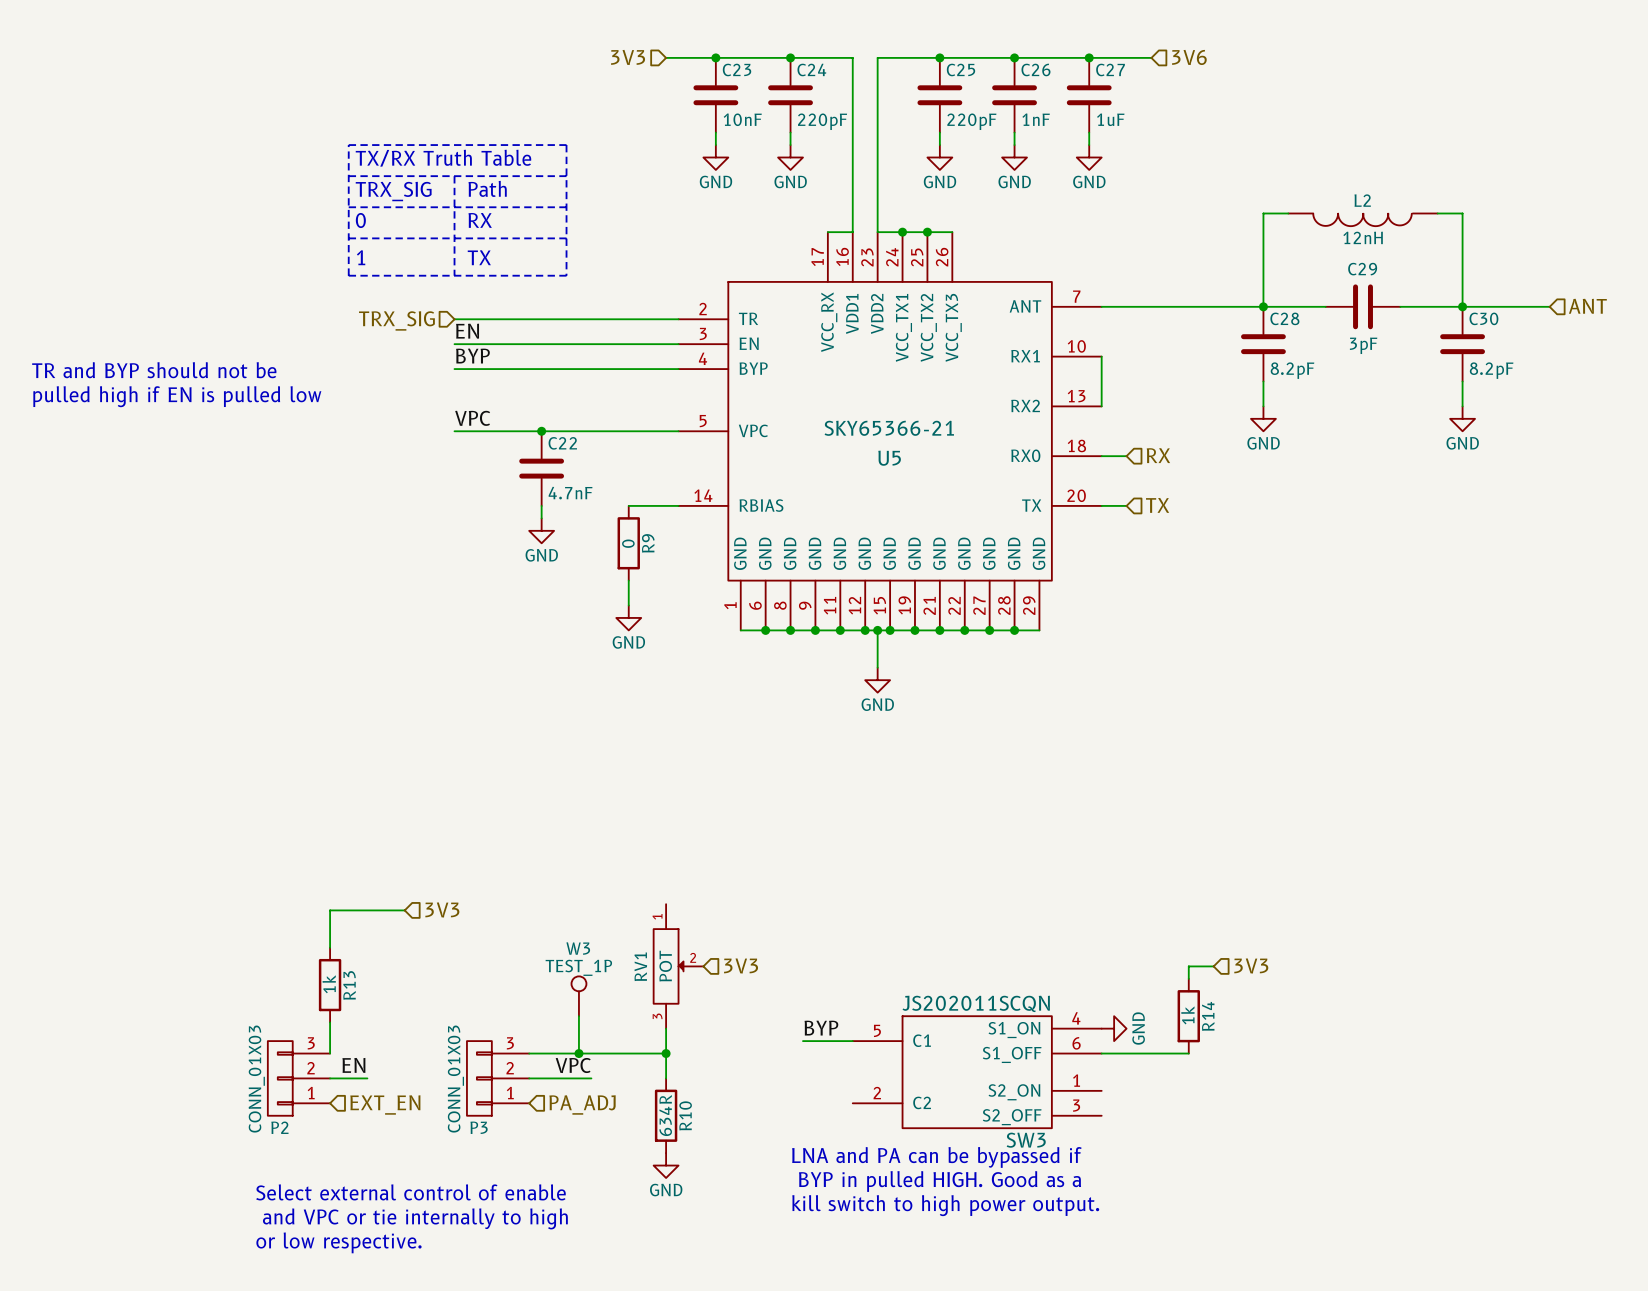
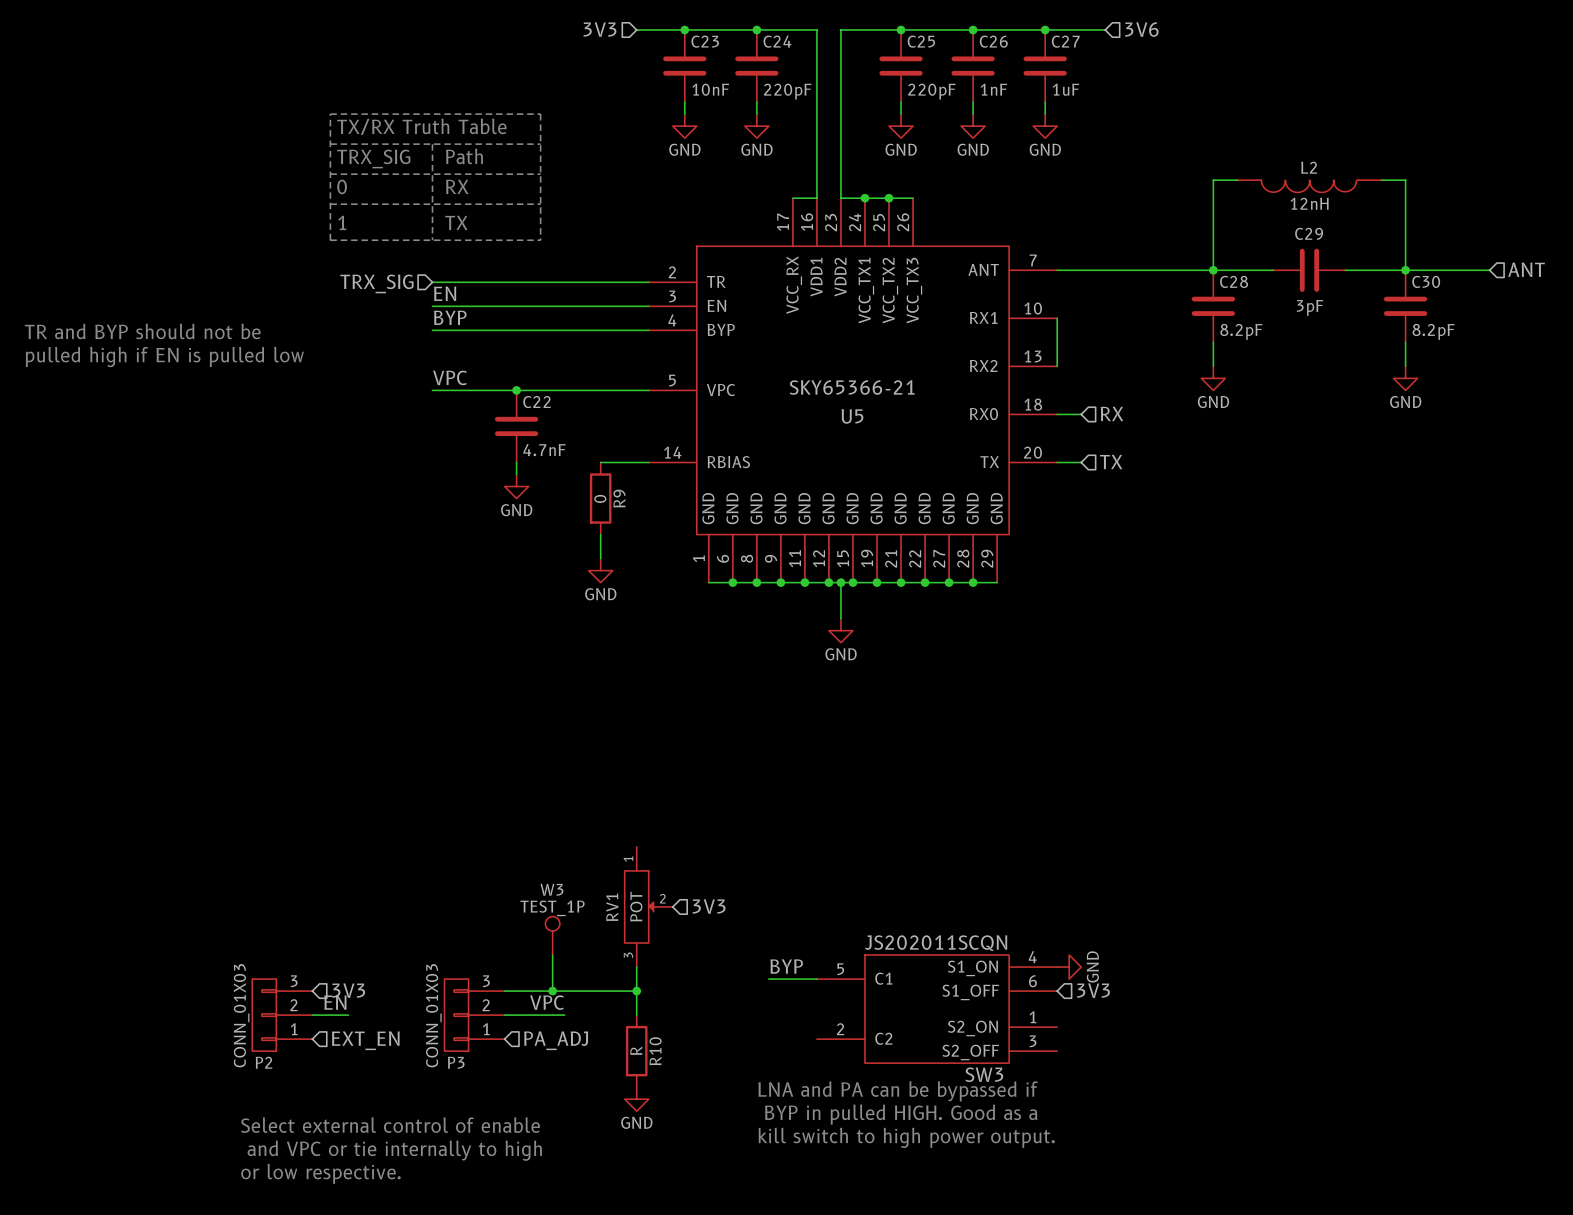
hierarchical label position: 3V3 (442, 909) -> 3V3 (348, 990)
wire: (404, 910) (330, 910) (330, 947) -> none
hierarchical label position: 3V3 (1251, 965) -> 3V3 (1093, 990)
wire: (1213, 966) (1188, 966) (1188, 978) -> none
R13: 1k (330, 985) -> none
R14: 1k (1188, 1016) -> none
wire: (330, 1022) (330, 1053) -> none
wire: (1101, 1053) (1188, 1053) -> none
R10 value: 634R (665, 1115) -> R (636, 1050)

